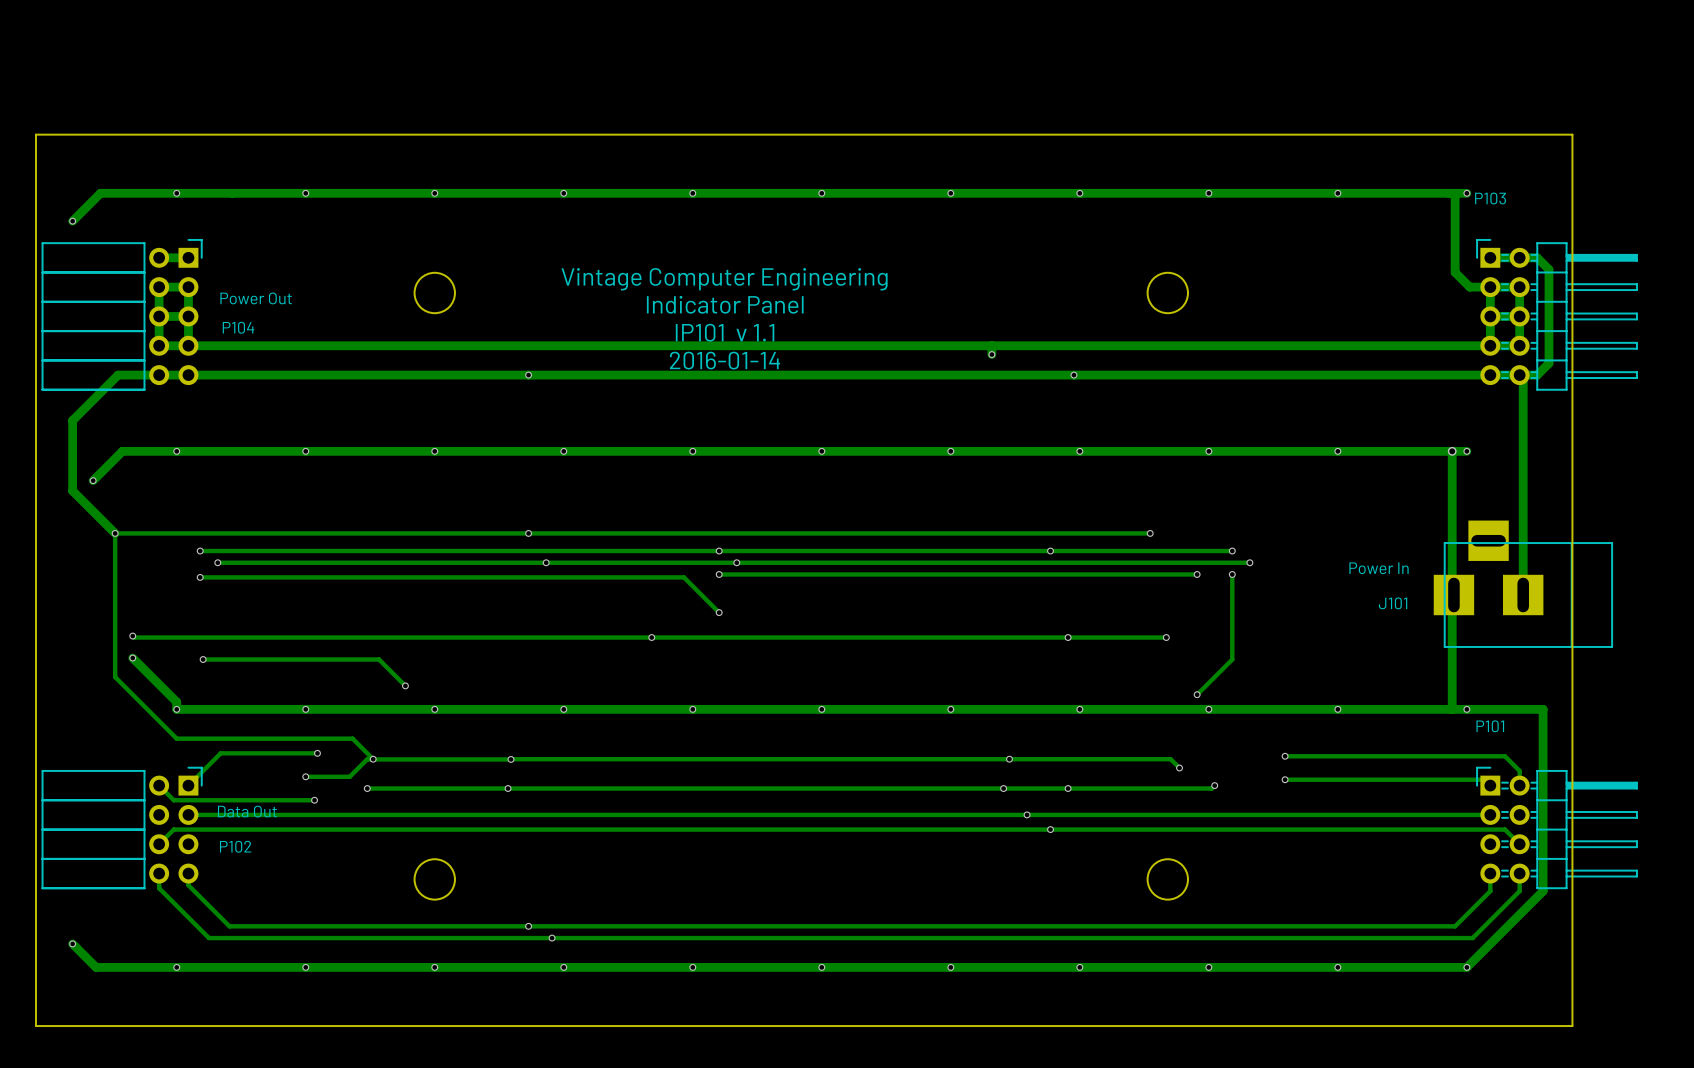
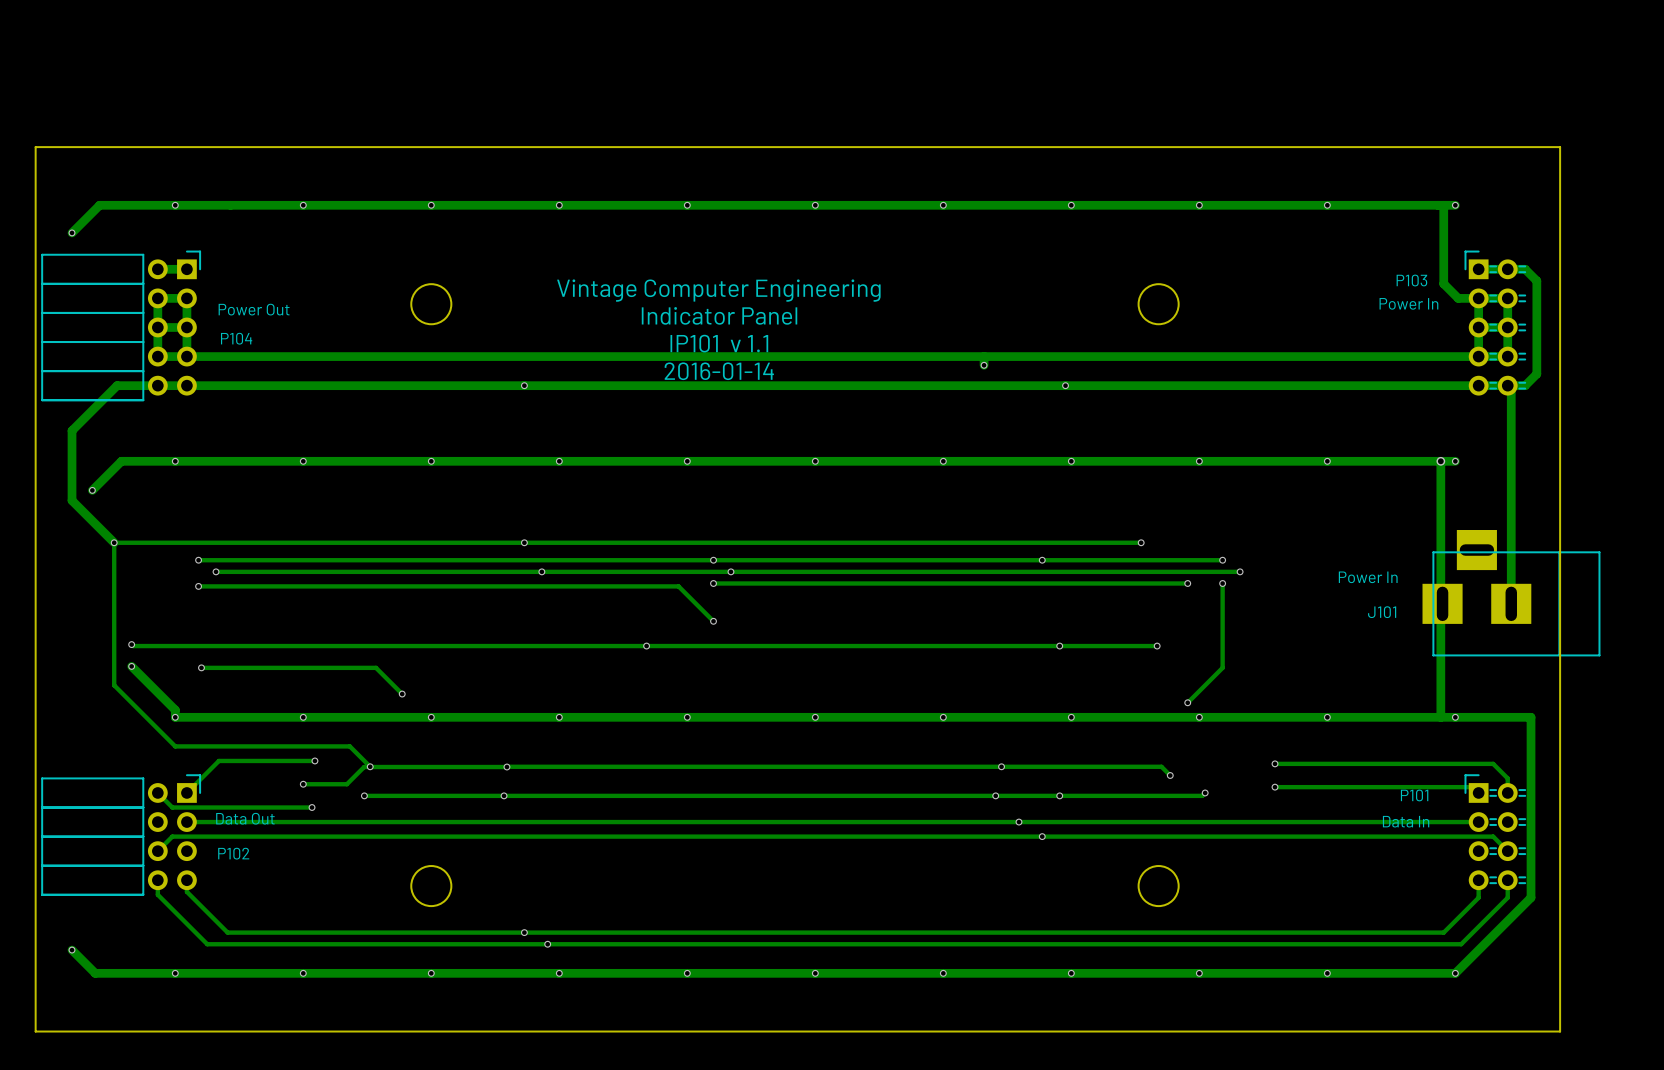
P103 name position: P103 (1490, 198) -> P103 (1411, 280)
P103 footprint: [1476, 239, 1638, 391] -> [1464, 250, 1527, 396]
P103 value: none -> Power In (1408, 303)
P101 name position: P101 (1490, 726) -> P101 (1414, 795)
P101 footprint: [1476, 766, 1638, 890] -> [1464, 774, 1527, 891]
P101 value: none -> Data In (1406, 821)

